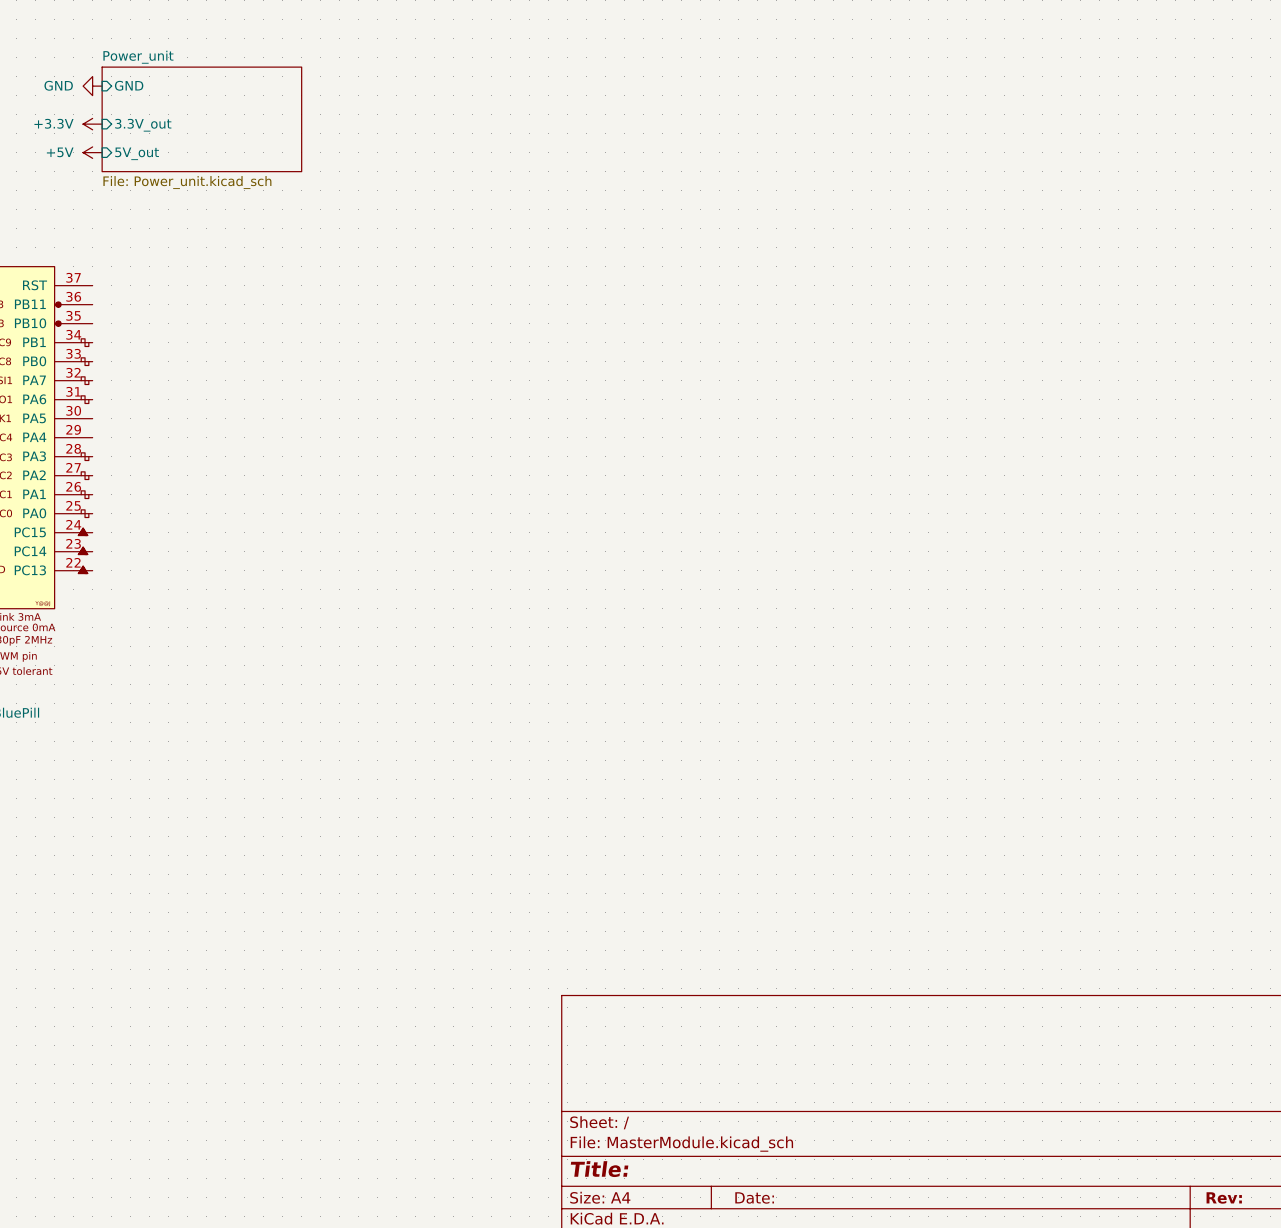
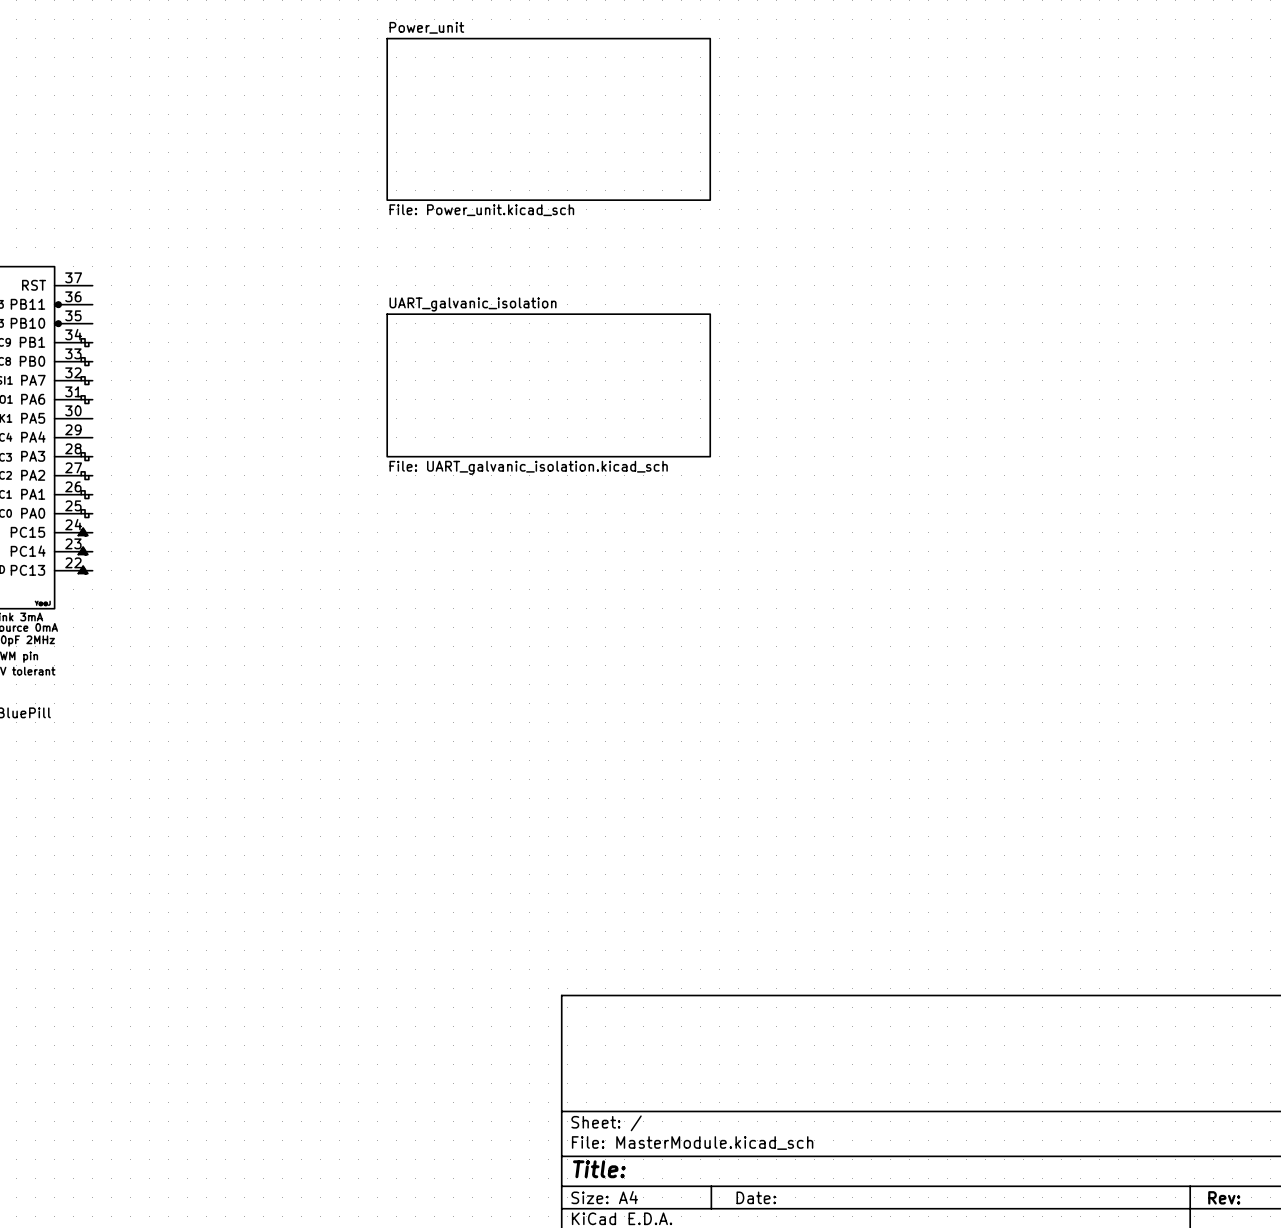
sheet pin: GND (129, 85) -> none
power symbol: GND (92, 86) -> none
sheet Power_unit: File: Power_unit.kicad_sch (201, 119) -> none
sheet Power_unit: none -> File: Power_unit.kicad_sch (548, 119)
power symbol: +3.3V (92, 124) -> none
sheet pin: 3.3V_out (143, 125) -> none
power symbol: +5V (92, 152) -> none
sheet pin: 5V_out (137, 153) -> none
sheet UART_galvanic_isolation: none -> File: UART_galvanic_isolation.kicad_sch (548, 385)

